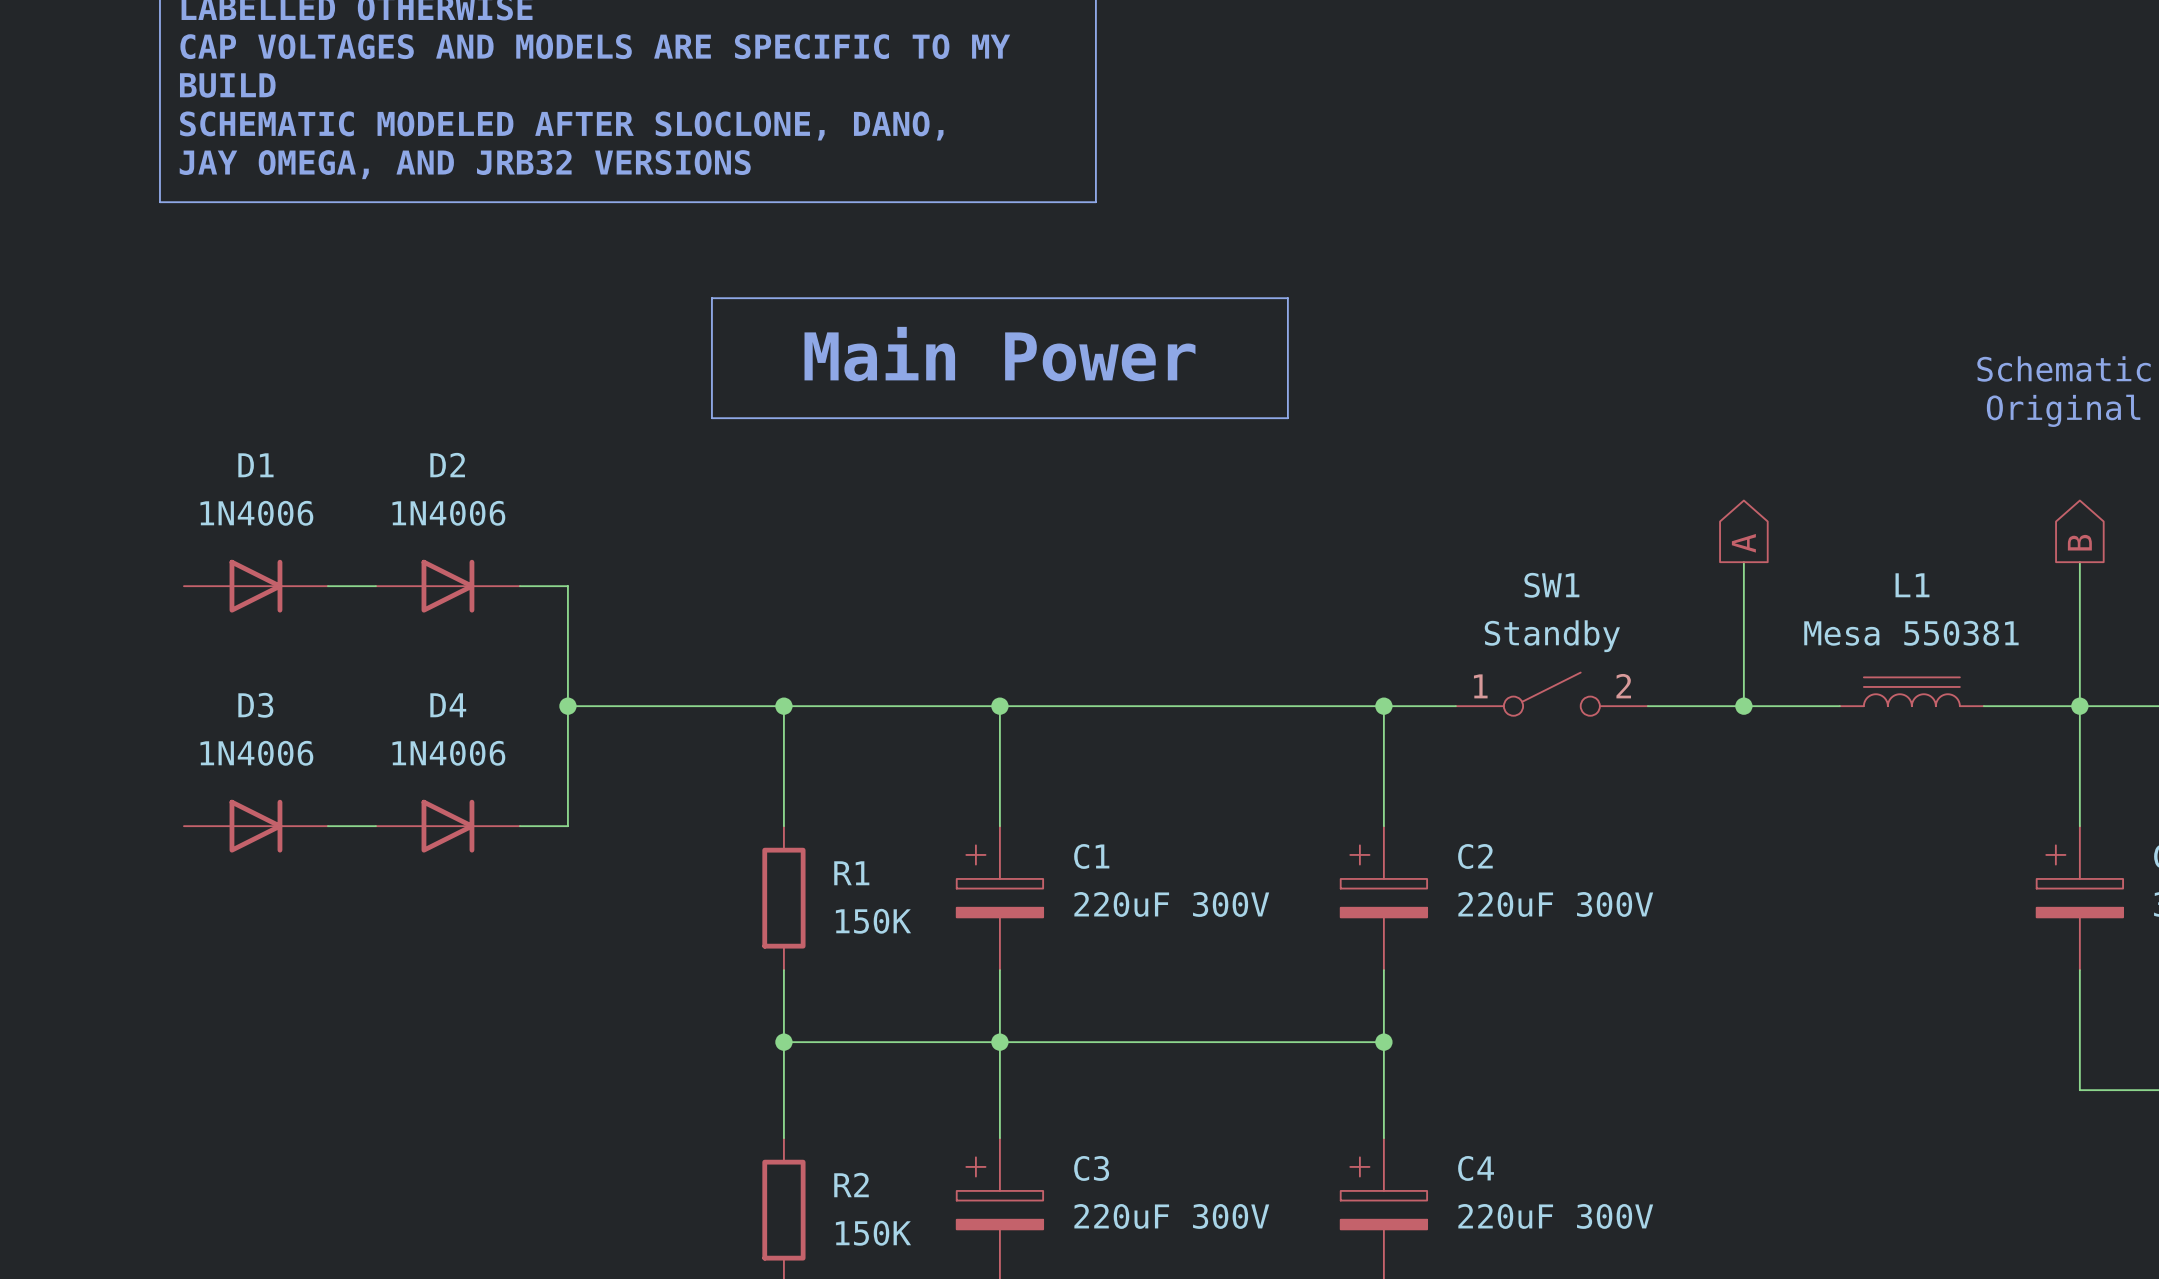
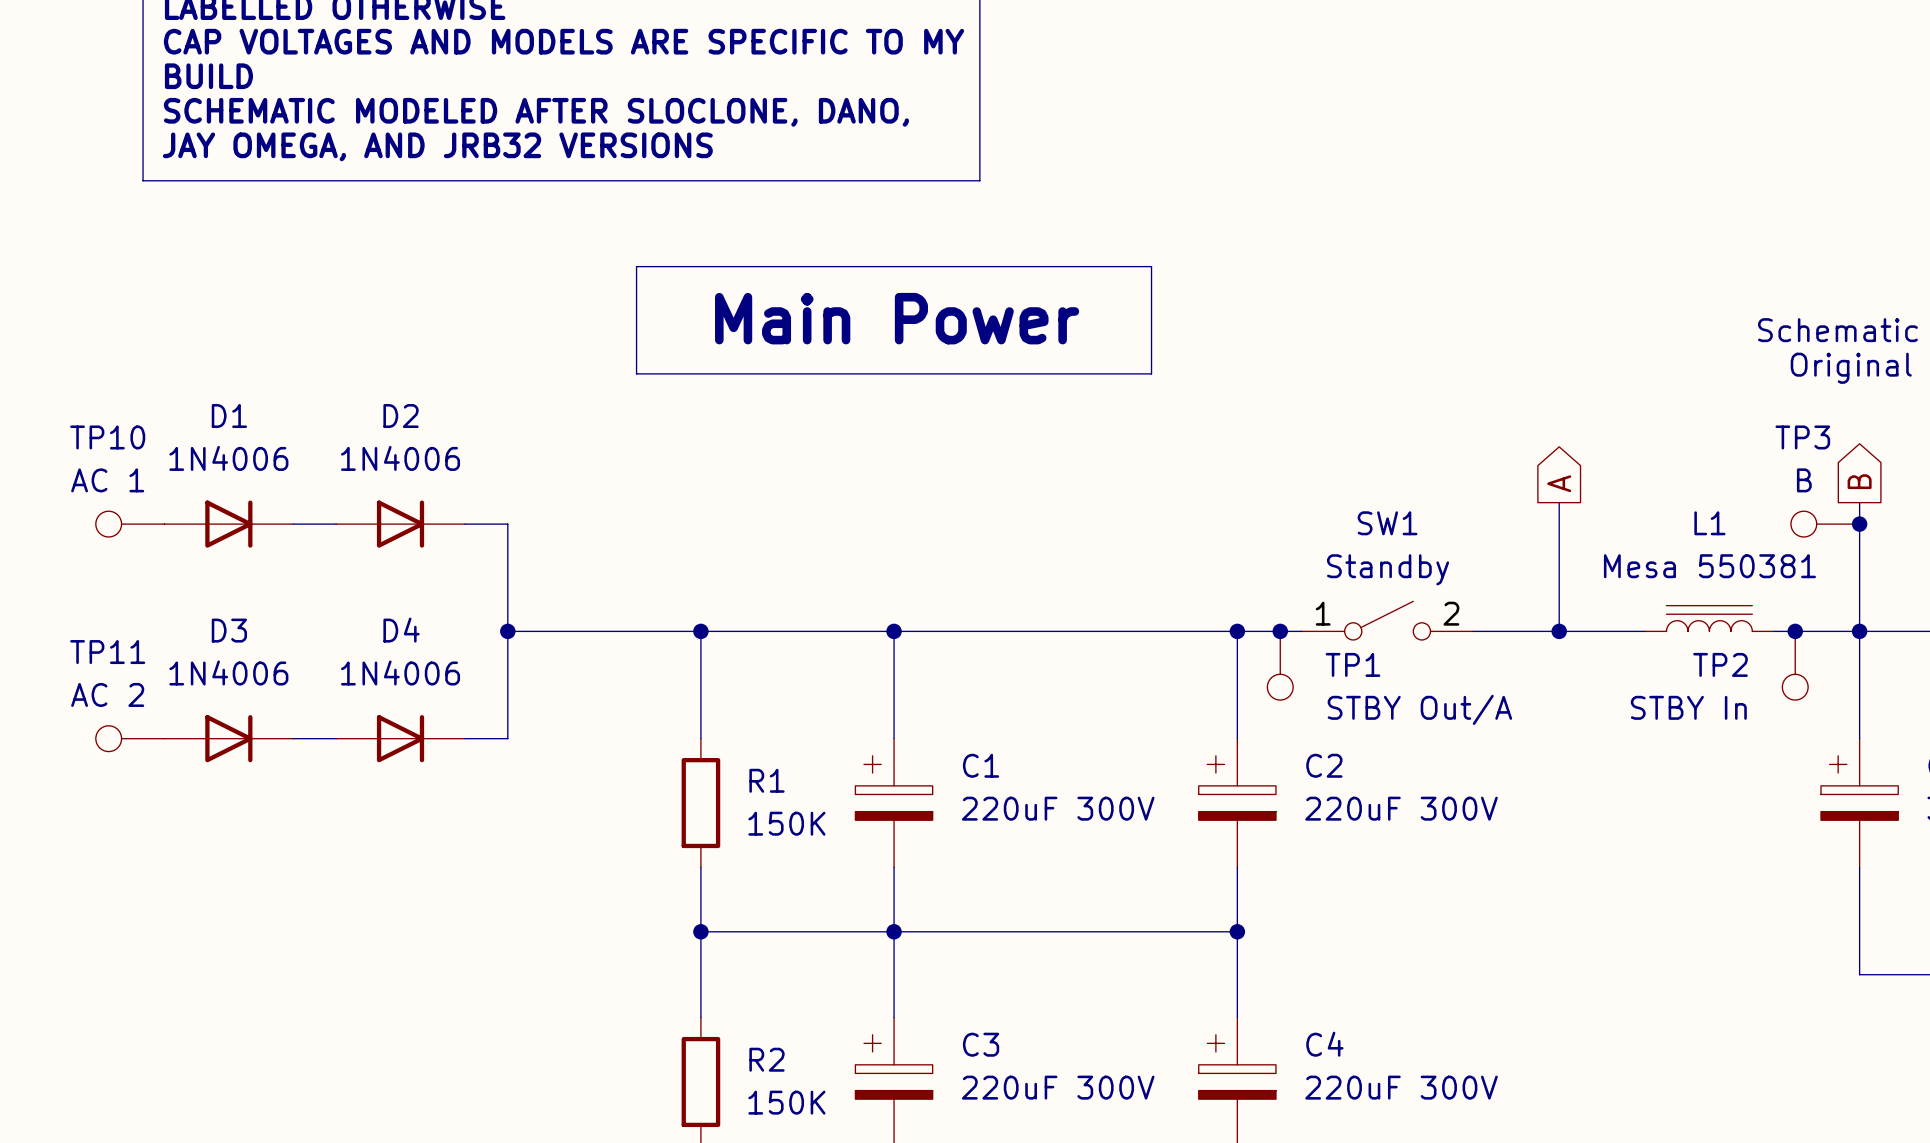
TP10: none -> AC 1 (130, 524)
TP3: none -> B (1825, 524)
junction: none -> (1859, 524)
junction: none -> (1280, 631)
junction: none -> (1795, 631)
TP1: none -> STBY Out/A (1280, 665)
TP2: none -> STBY In (1795, 665)
TP11: none -> AC 2 (130, 738)

